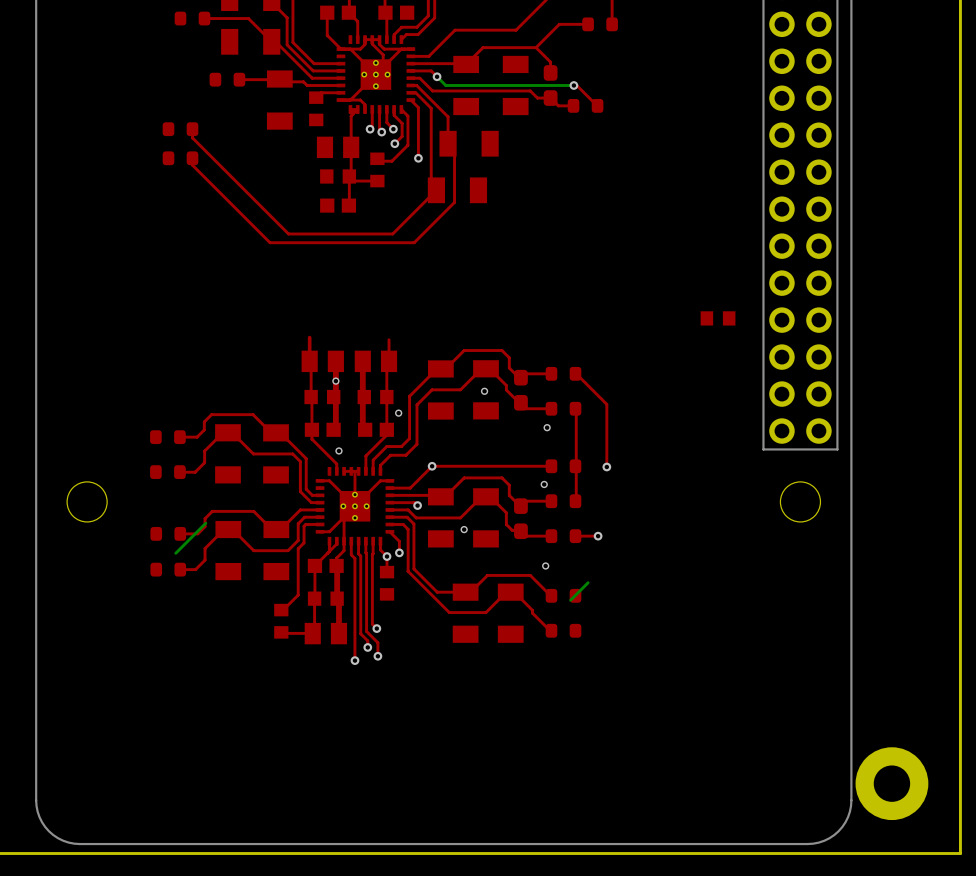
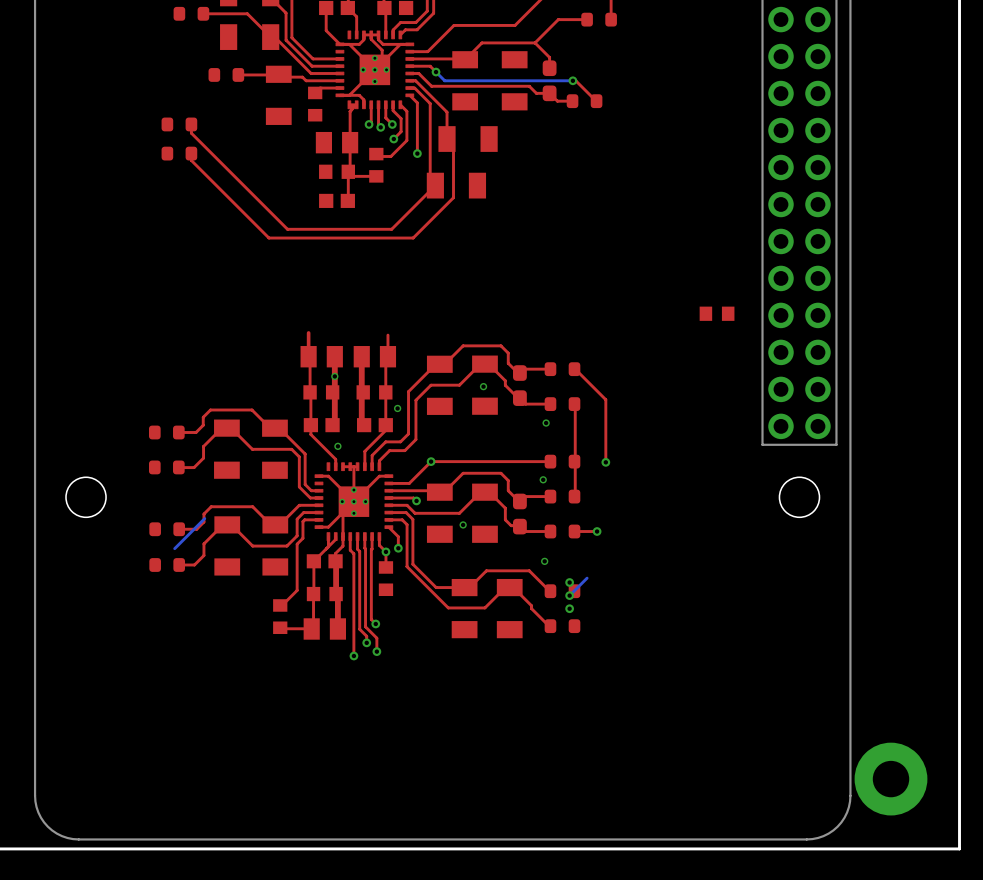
via: none -> (569, 582)
via: none -> (569, 595)
via: none -> (569, 608)

